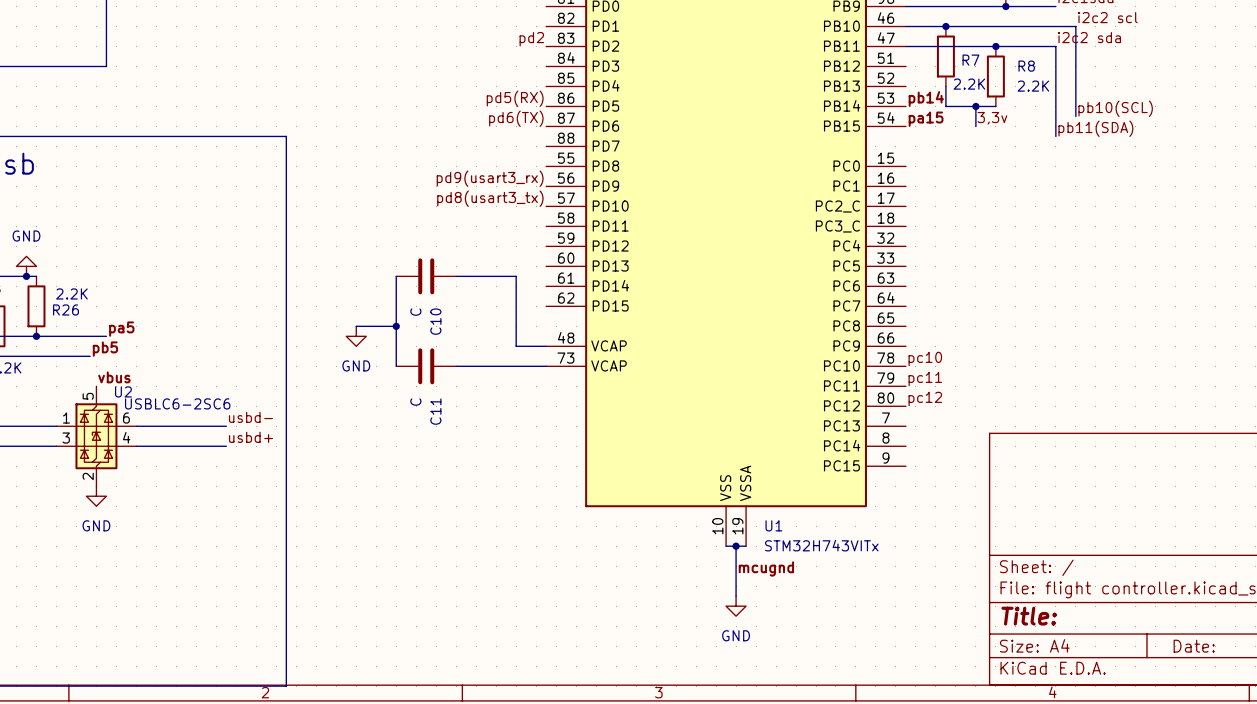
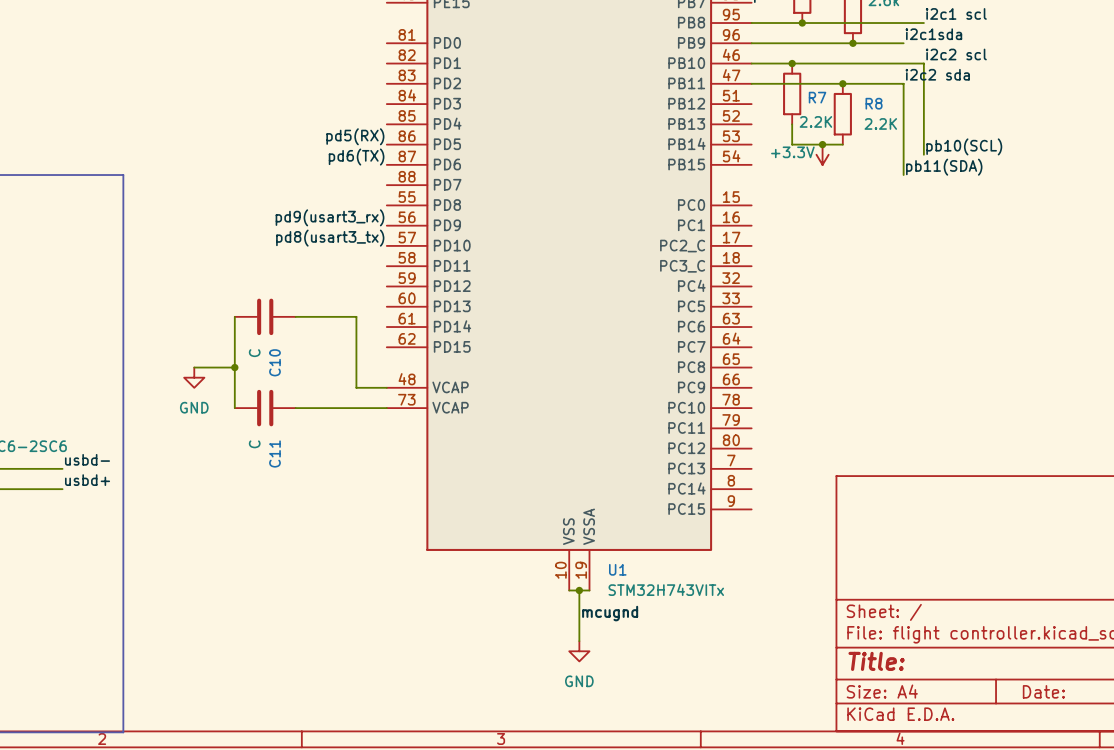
label: pd2 (531, 39) -> none
label: pb14 (926, 98) -> none
power symbol: none -> +3.3V (822, 154)
label: 3,3v (992, 118) -> none
label: pa15 (926, 119) -> none
label: pc10 (925, 359) -> none
label: pc11 (925, 379) -> none
label: pc12 (925, 399) -> none

